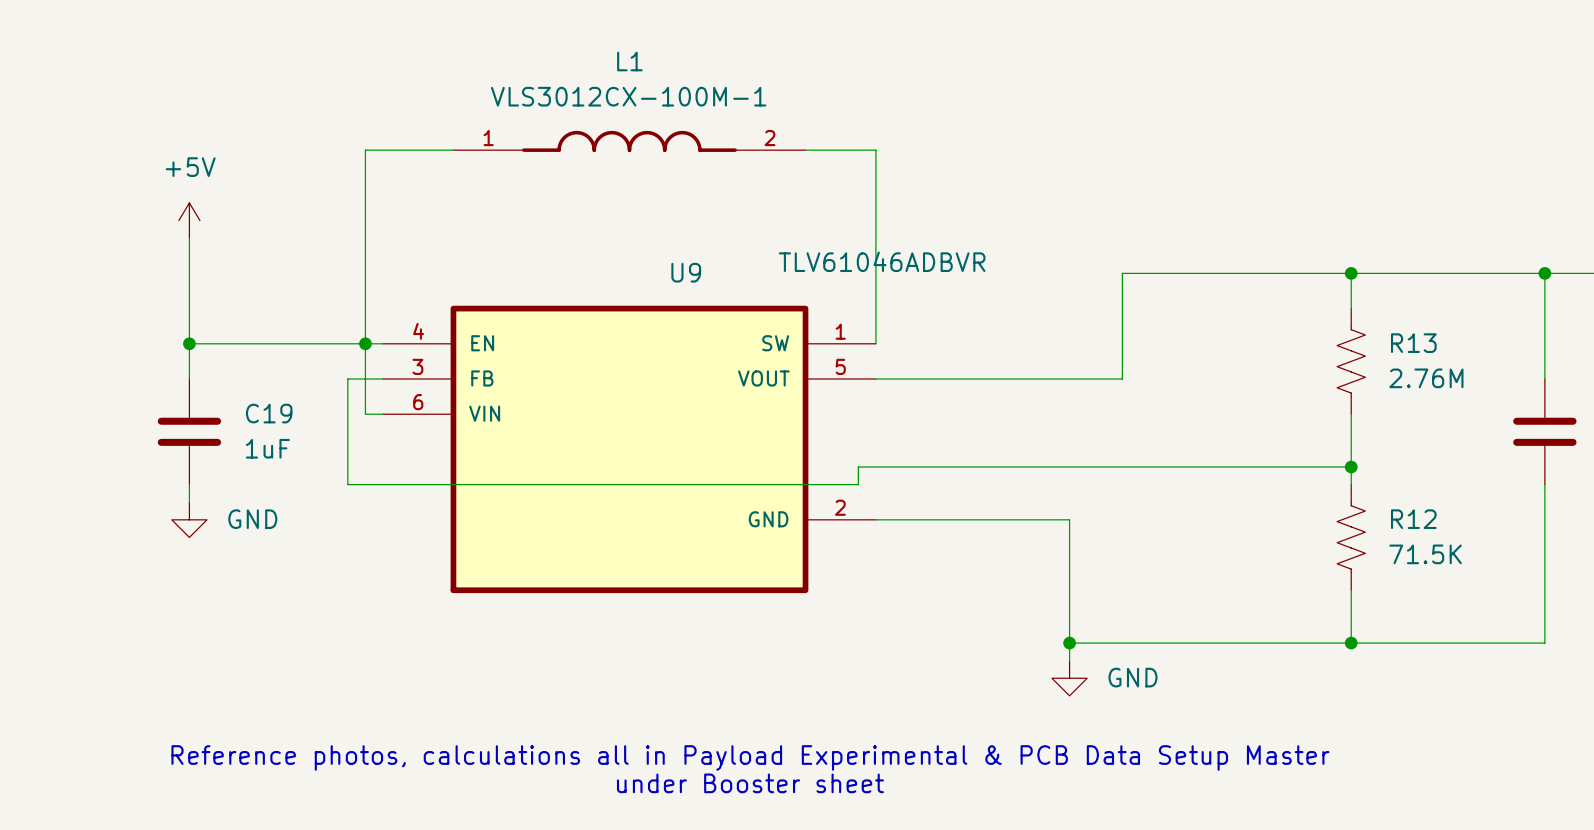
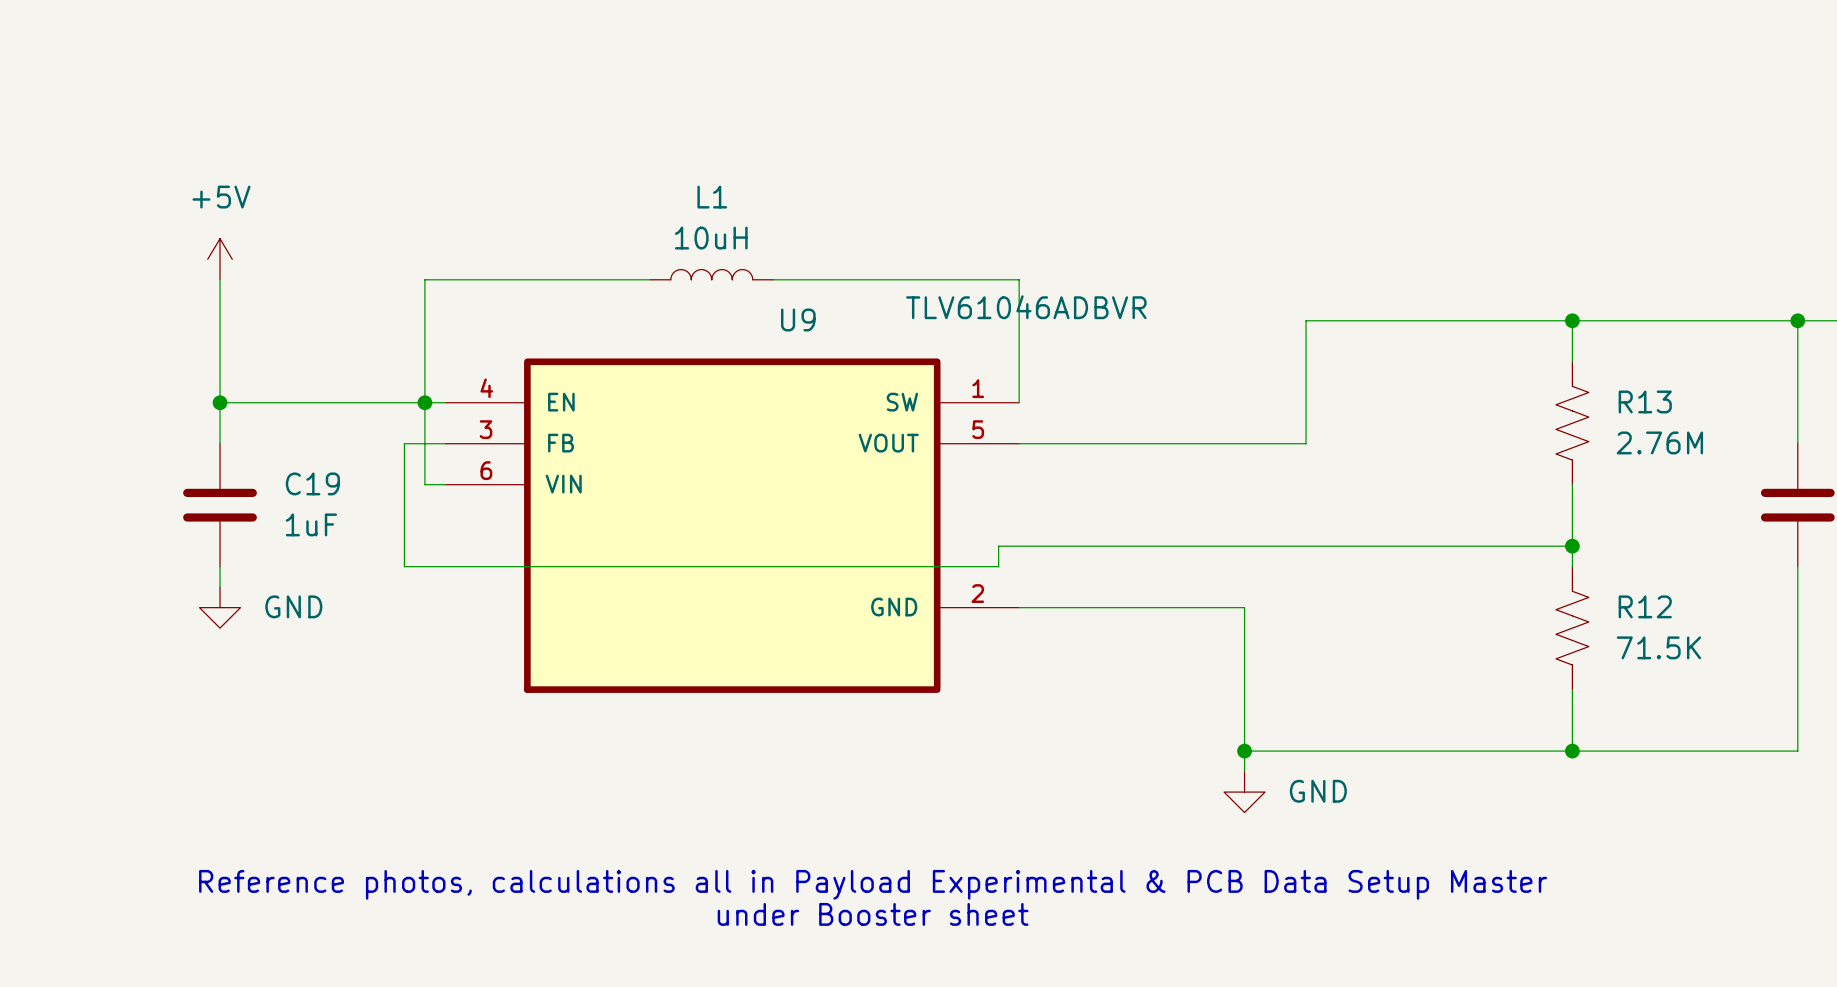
L1 value: VLS3012CX-100M-1 (628, 96) -> 10uH (711, 238)
L1 symbol: [453, 130, 806, 152] -> [650, 269, 774, 280]
wire: (453, 150) (365, 150) (365, 238) -> (650, 279) (424, 279)
wire: (805, 150) (875, 150) (875, 238) -> (773, 279) (1019, 279)

